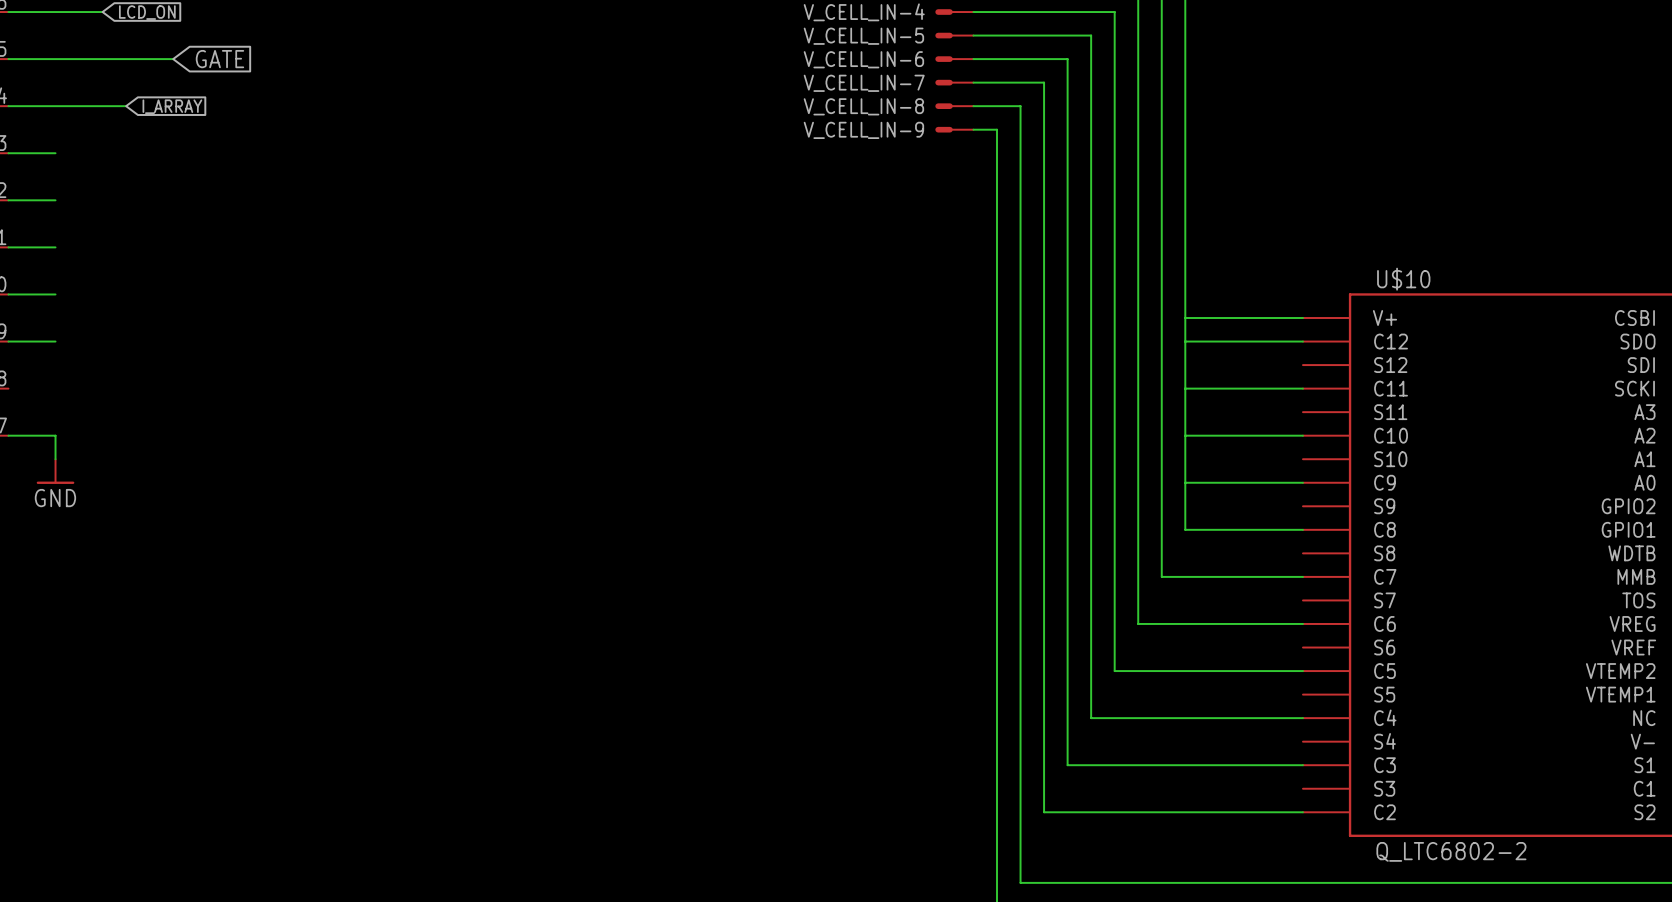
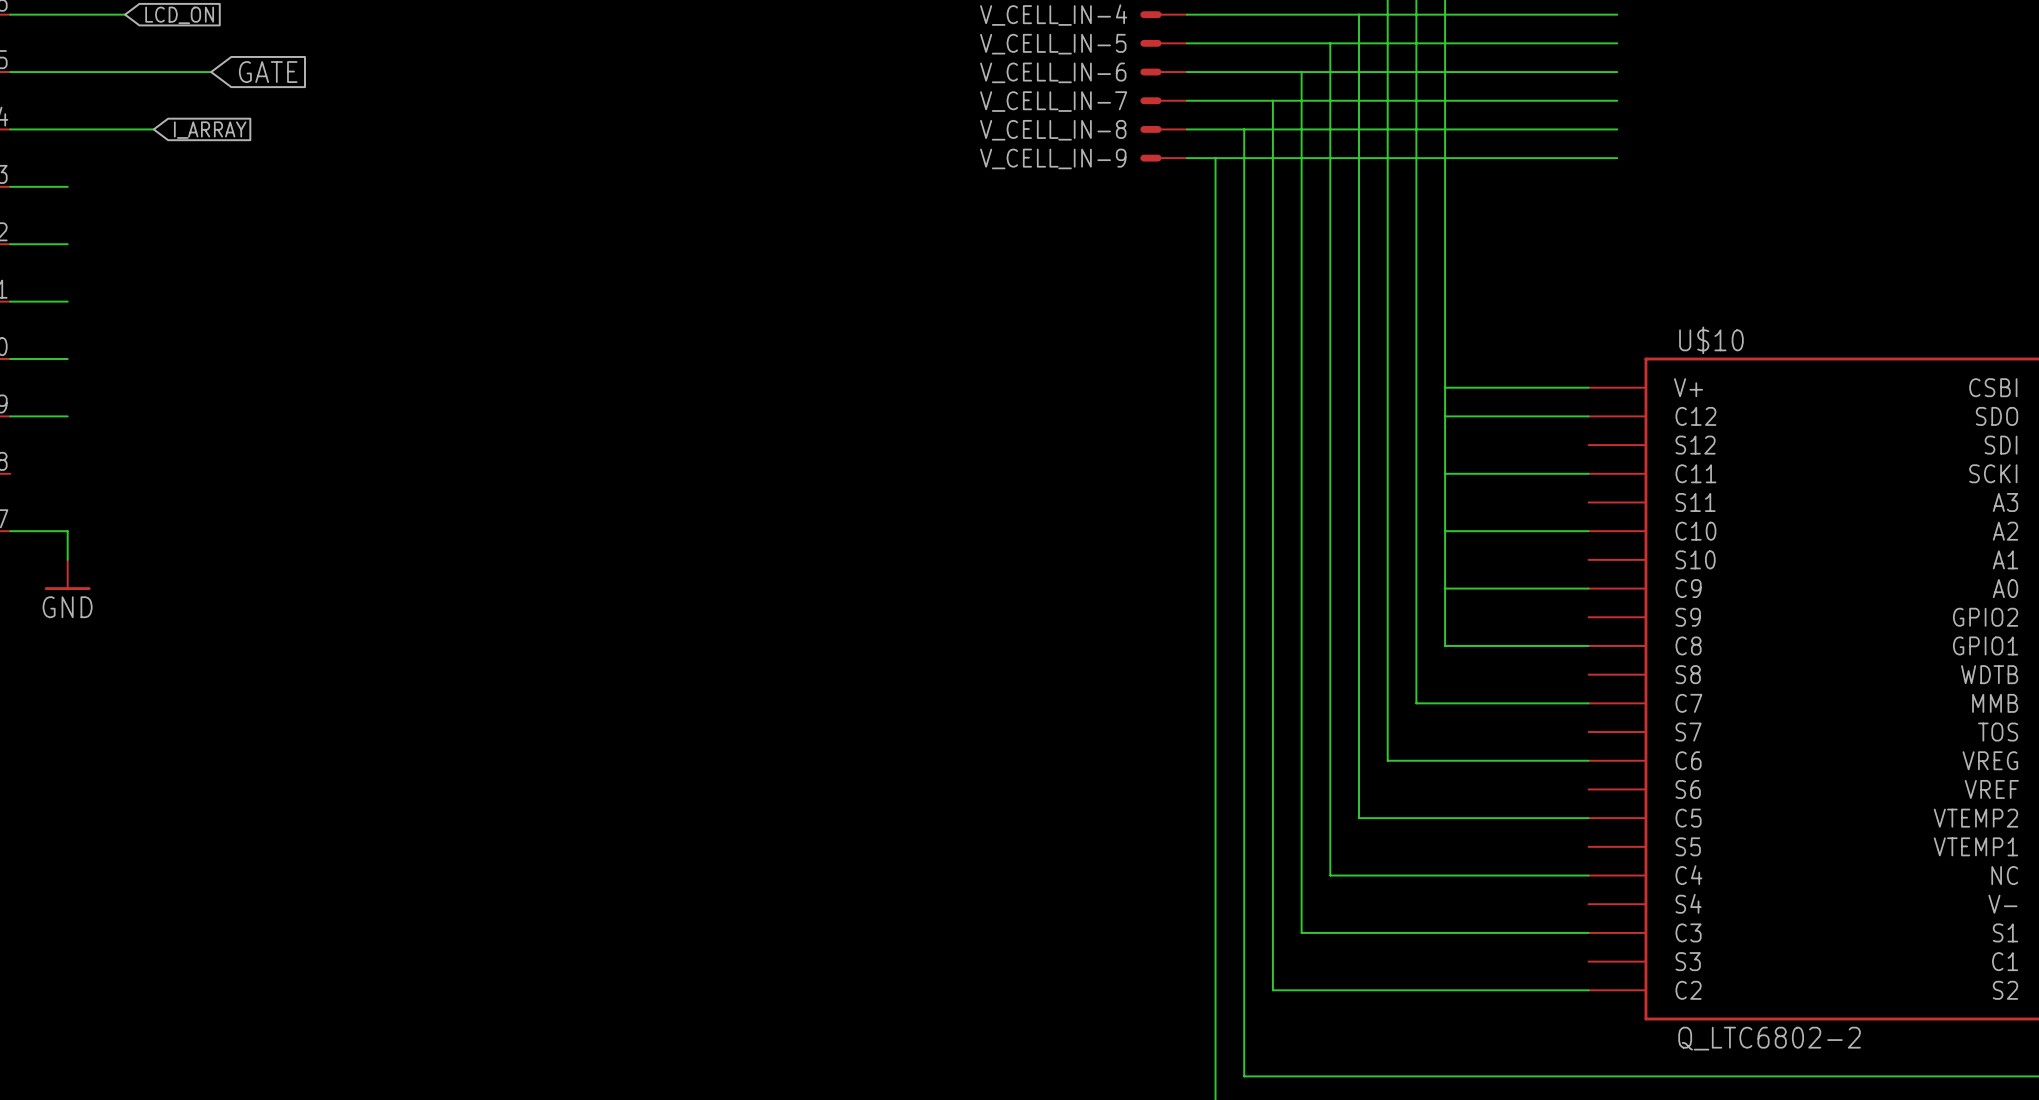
wire: none -> (1359, 14) (1617, 14)
wire: none -> (1330, 43) (1617, 43)
wire: none -> (1301, 72) (1617, 72)
wire: none -> (1272, 100) (1617, 100)
wire: none -> (1244, 129) (1617, 129)
wire: none -> (1215, 158) (1617, 158)

